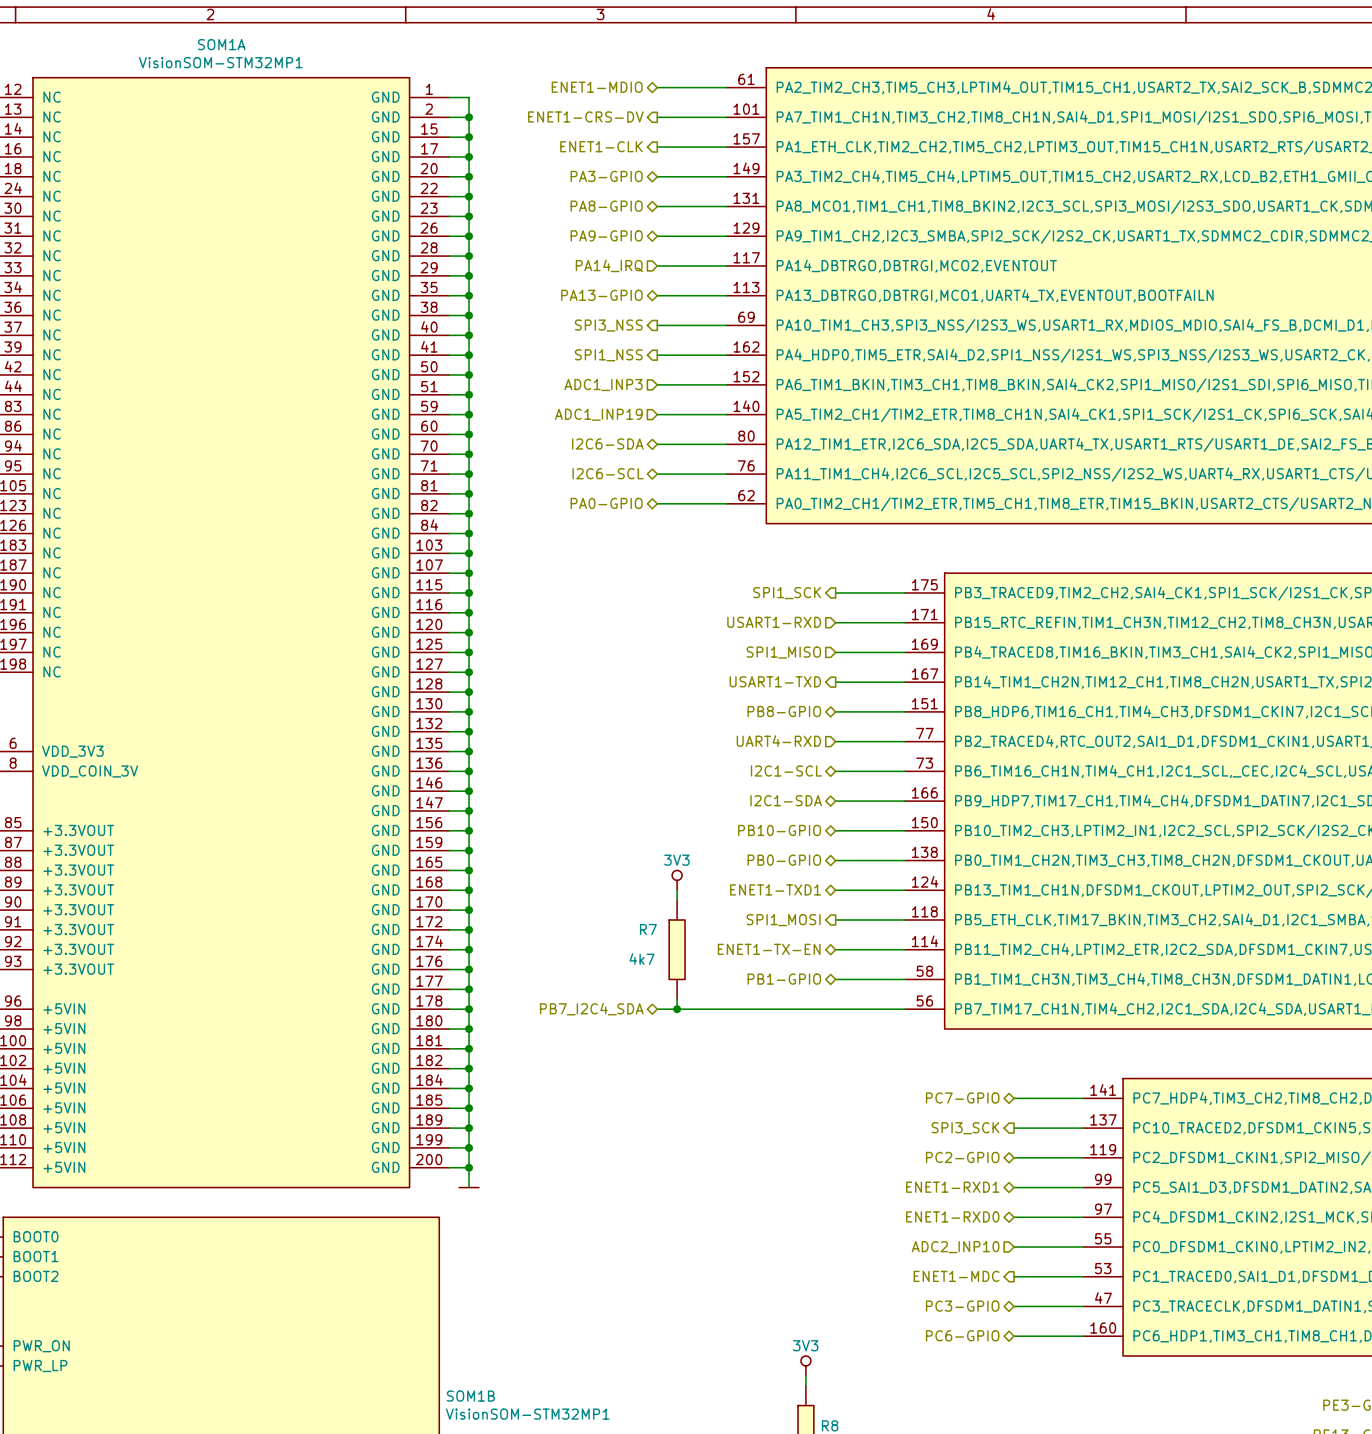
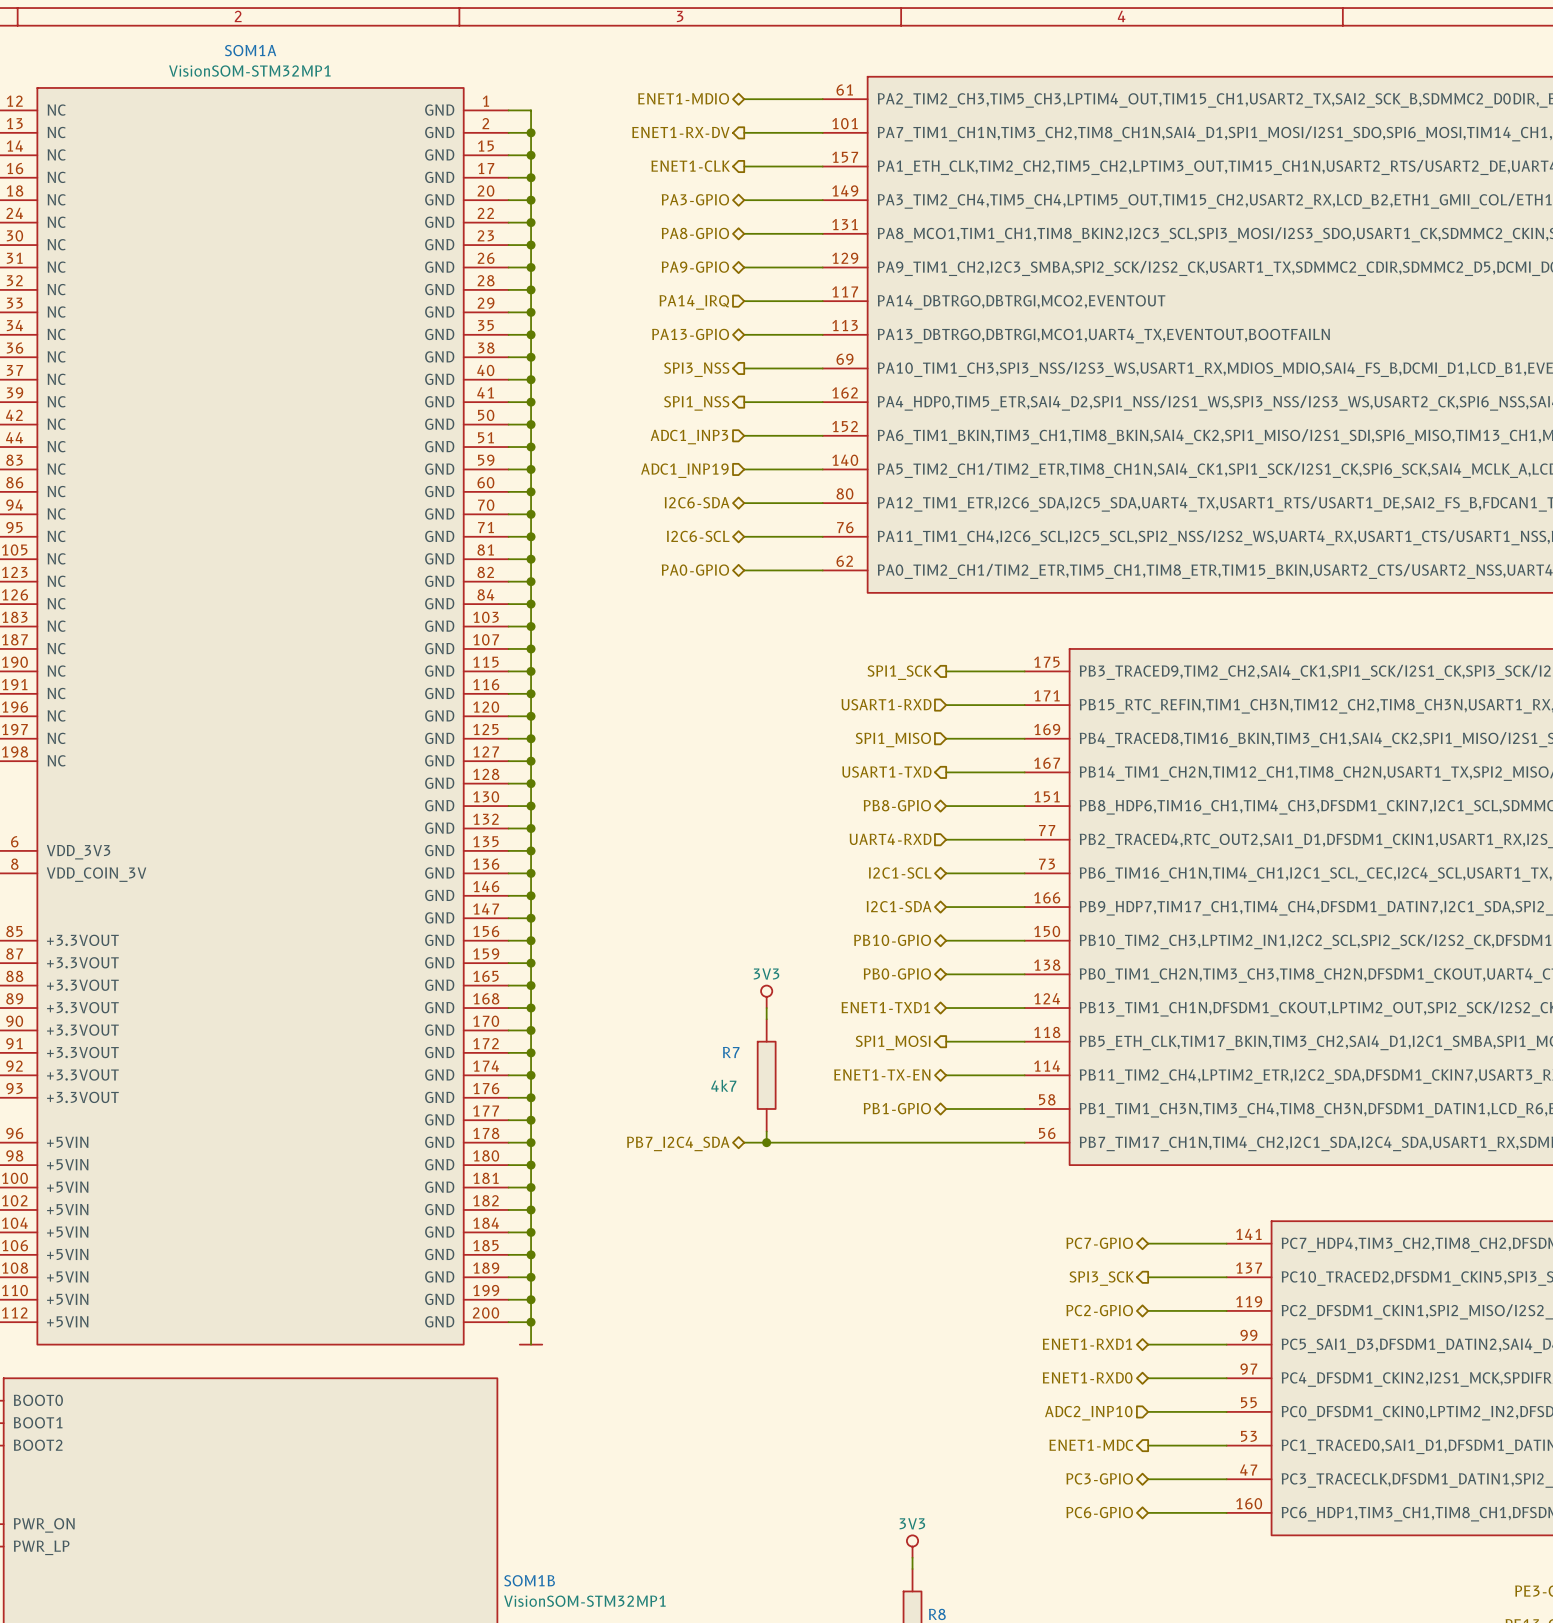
hierarchical label: ENET1-CRS-DV (585, 116) -> ENET1-RX-DV (680, 132)

